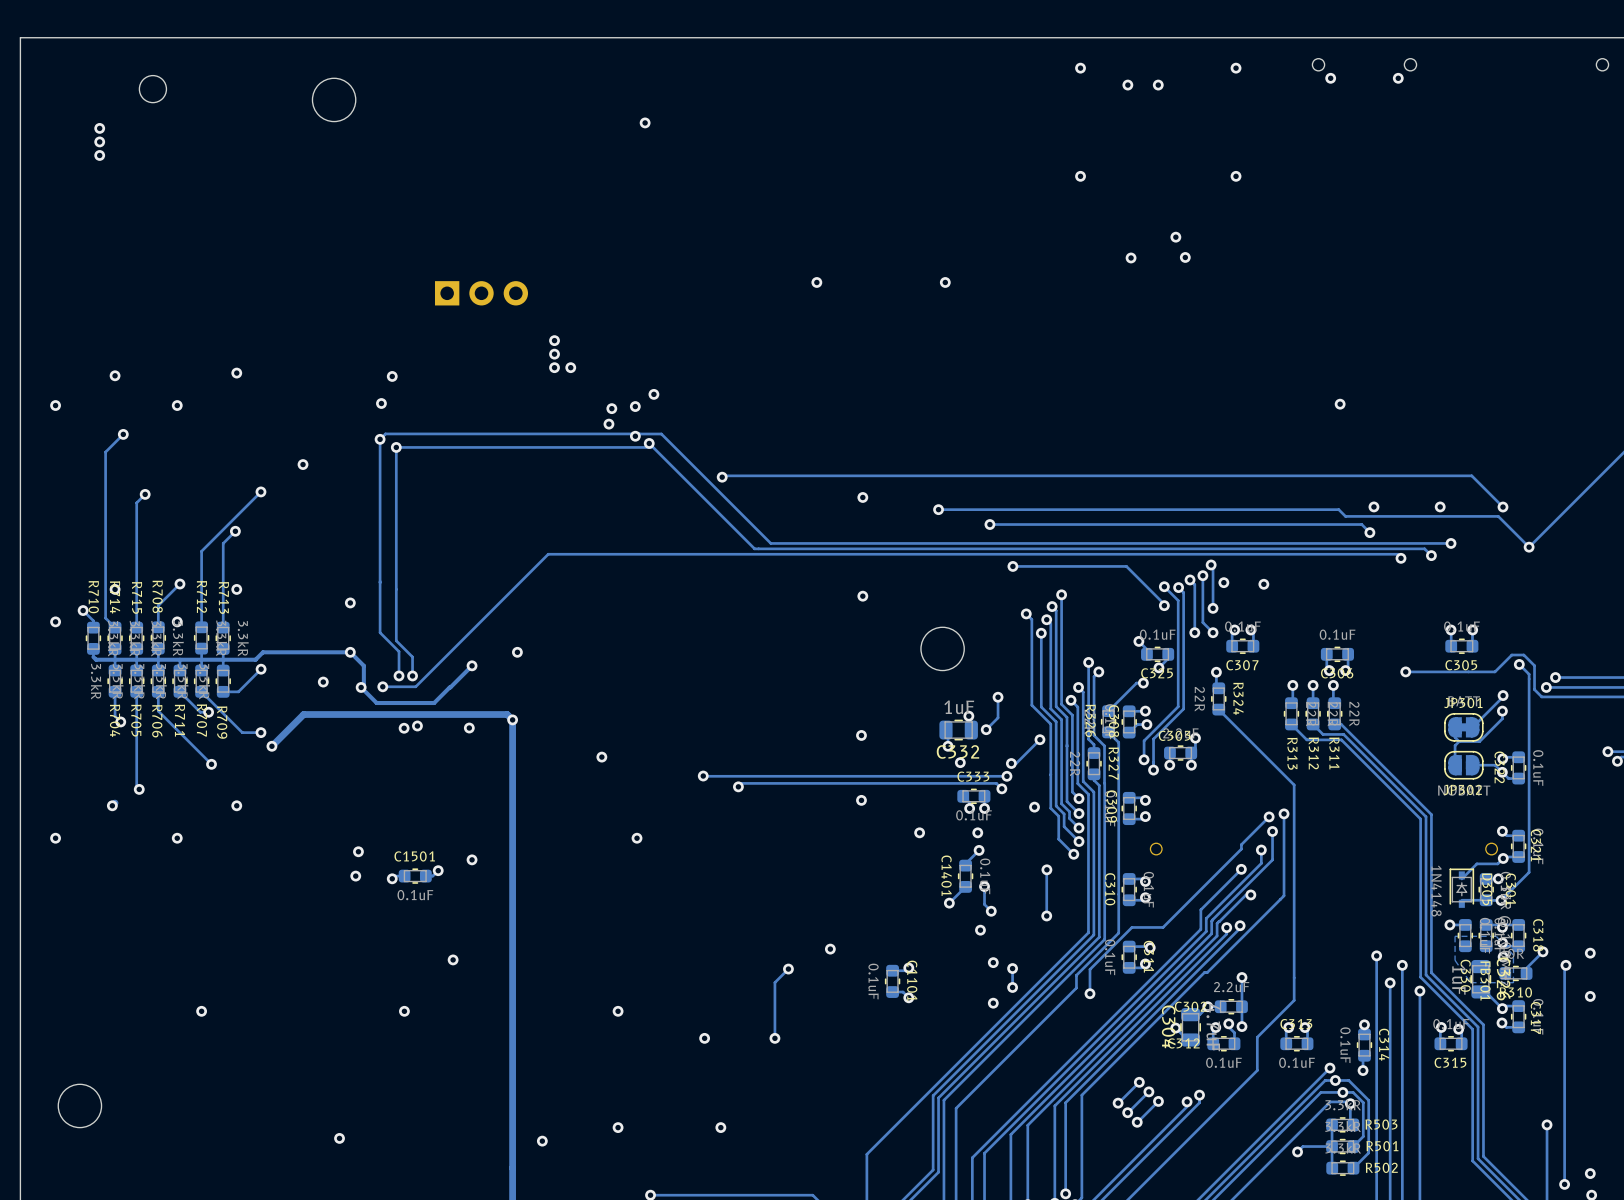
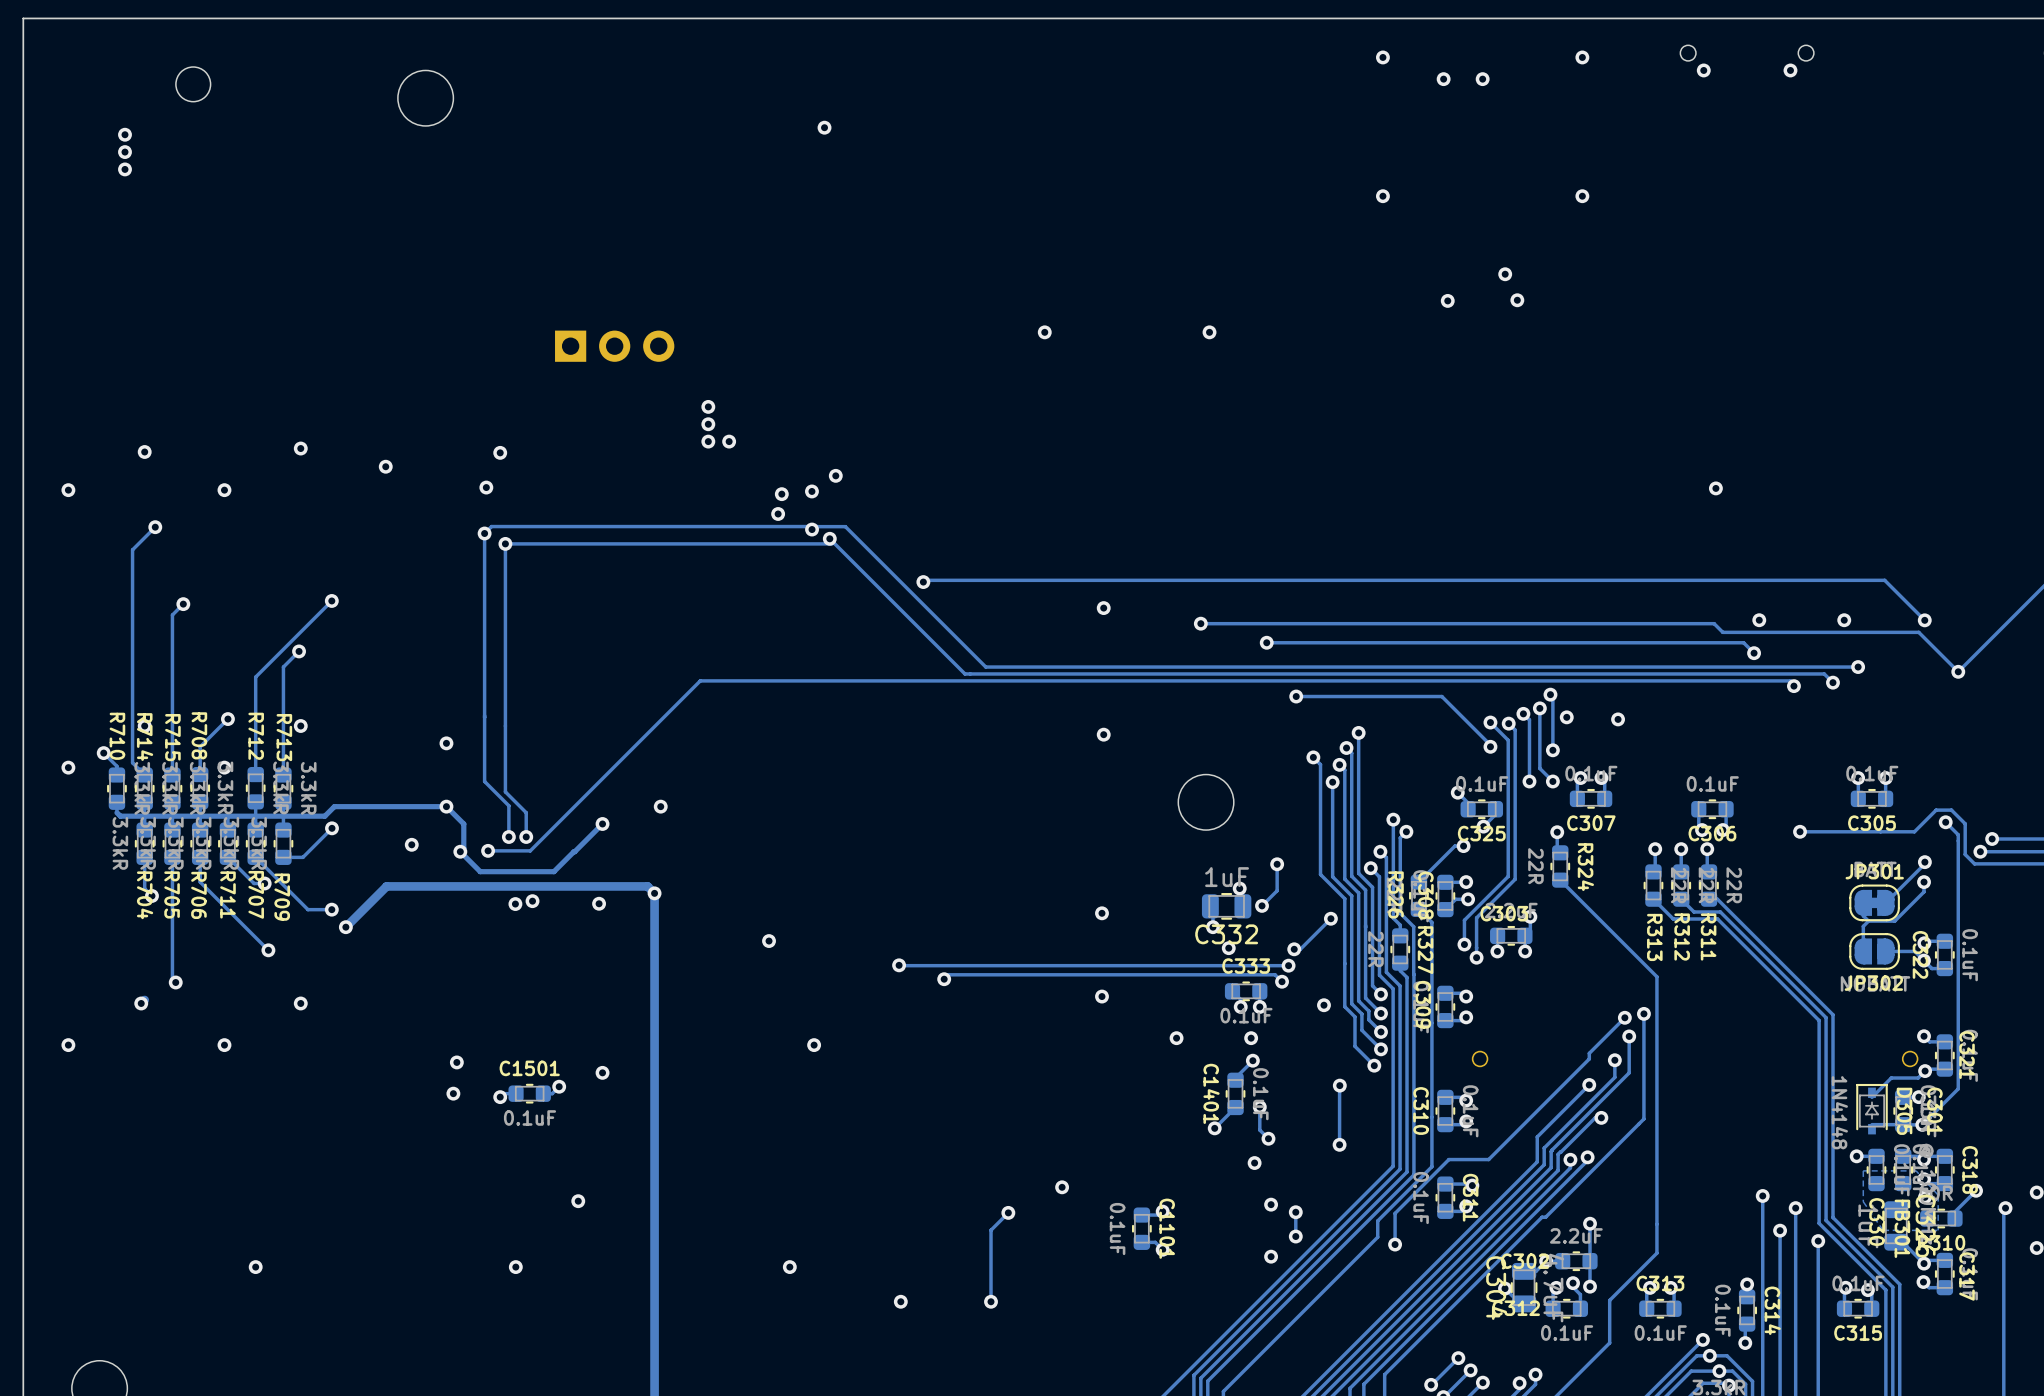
via position: (303, 464) -> (385, 466)

